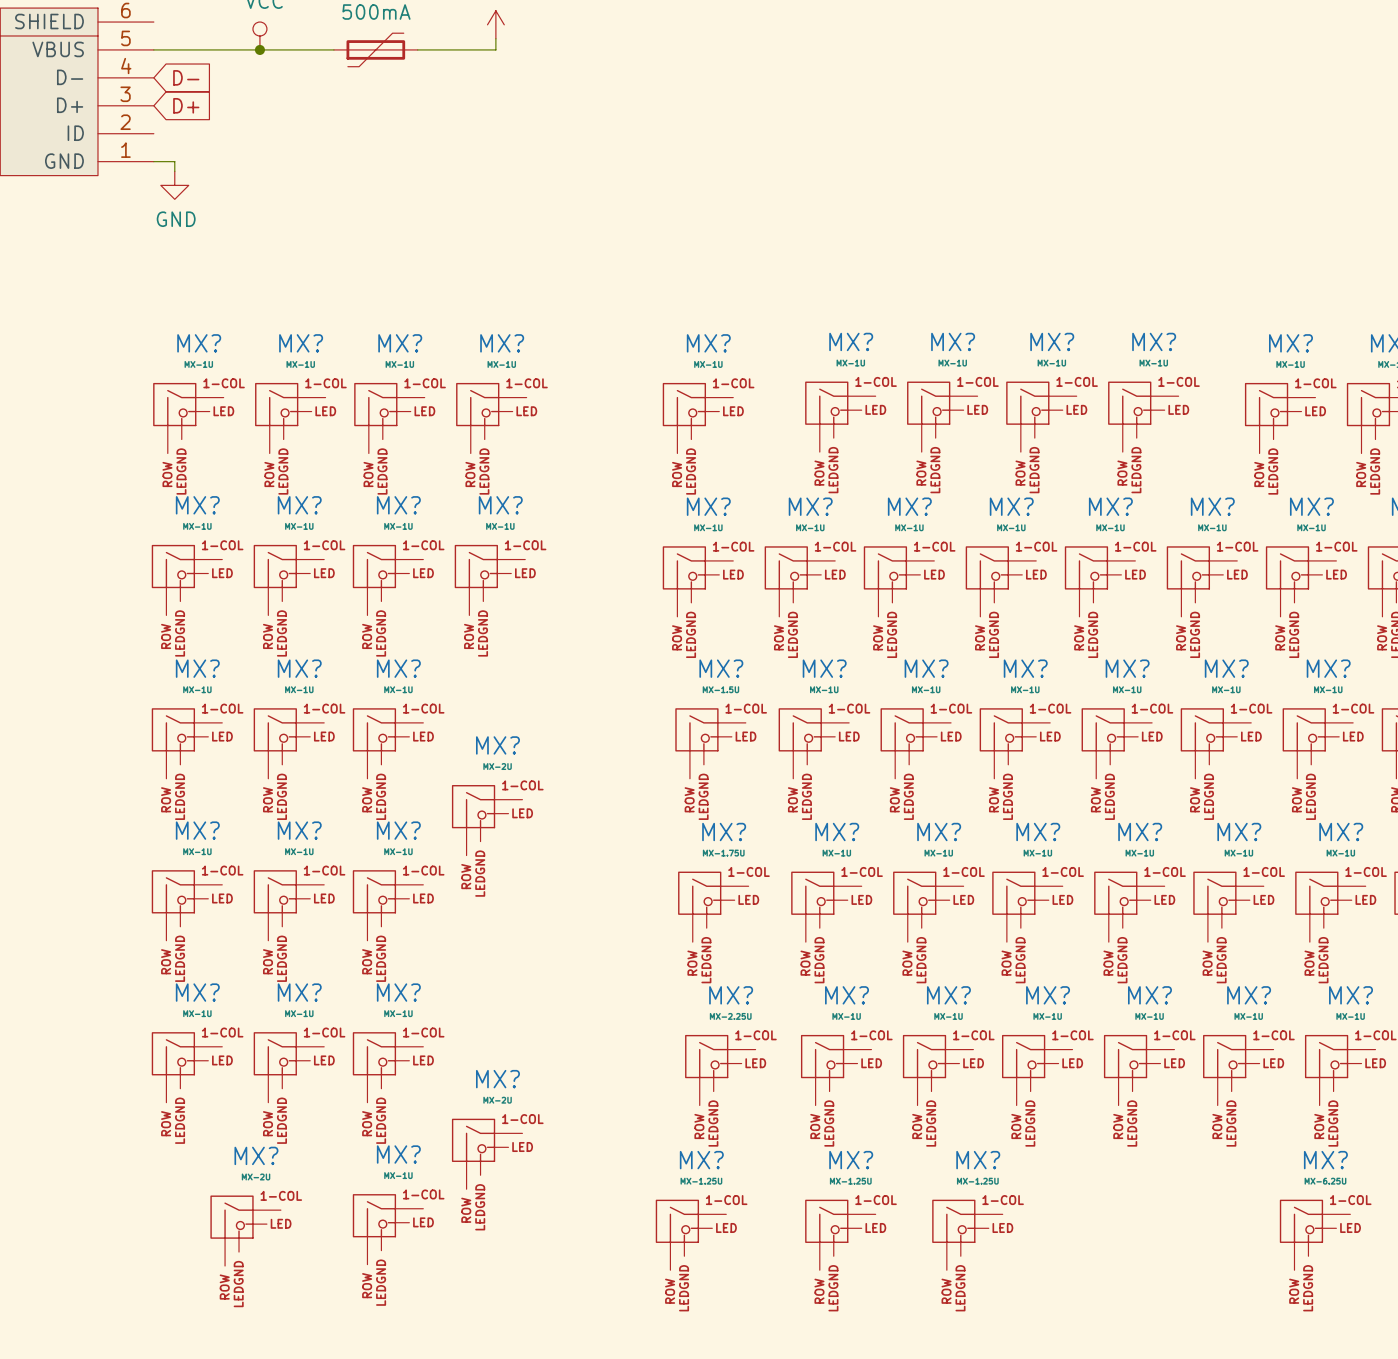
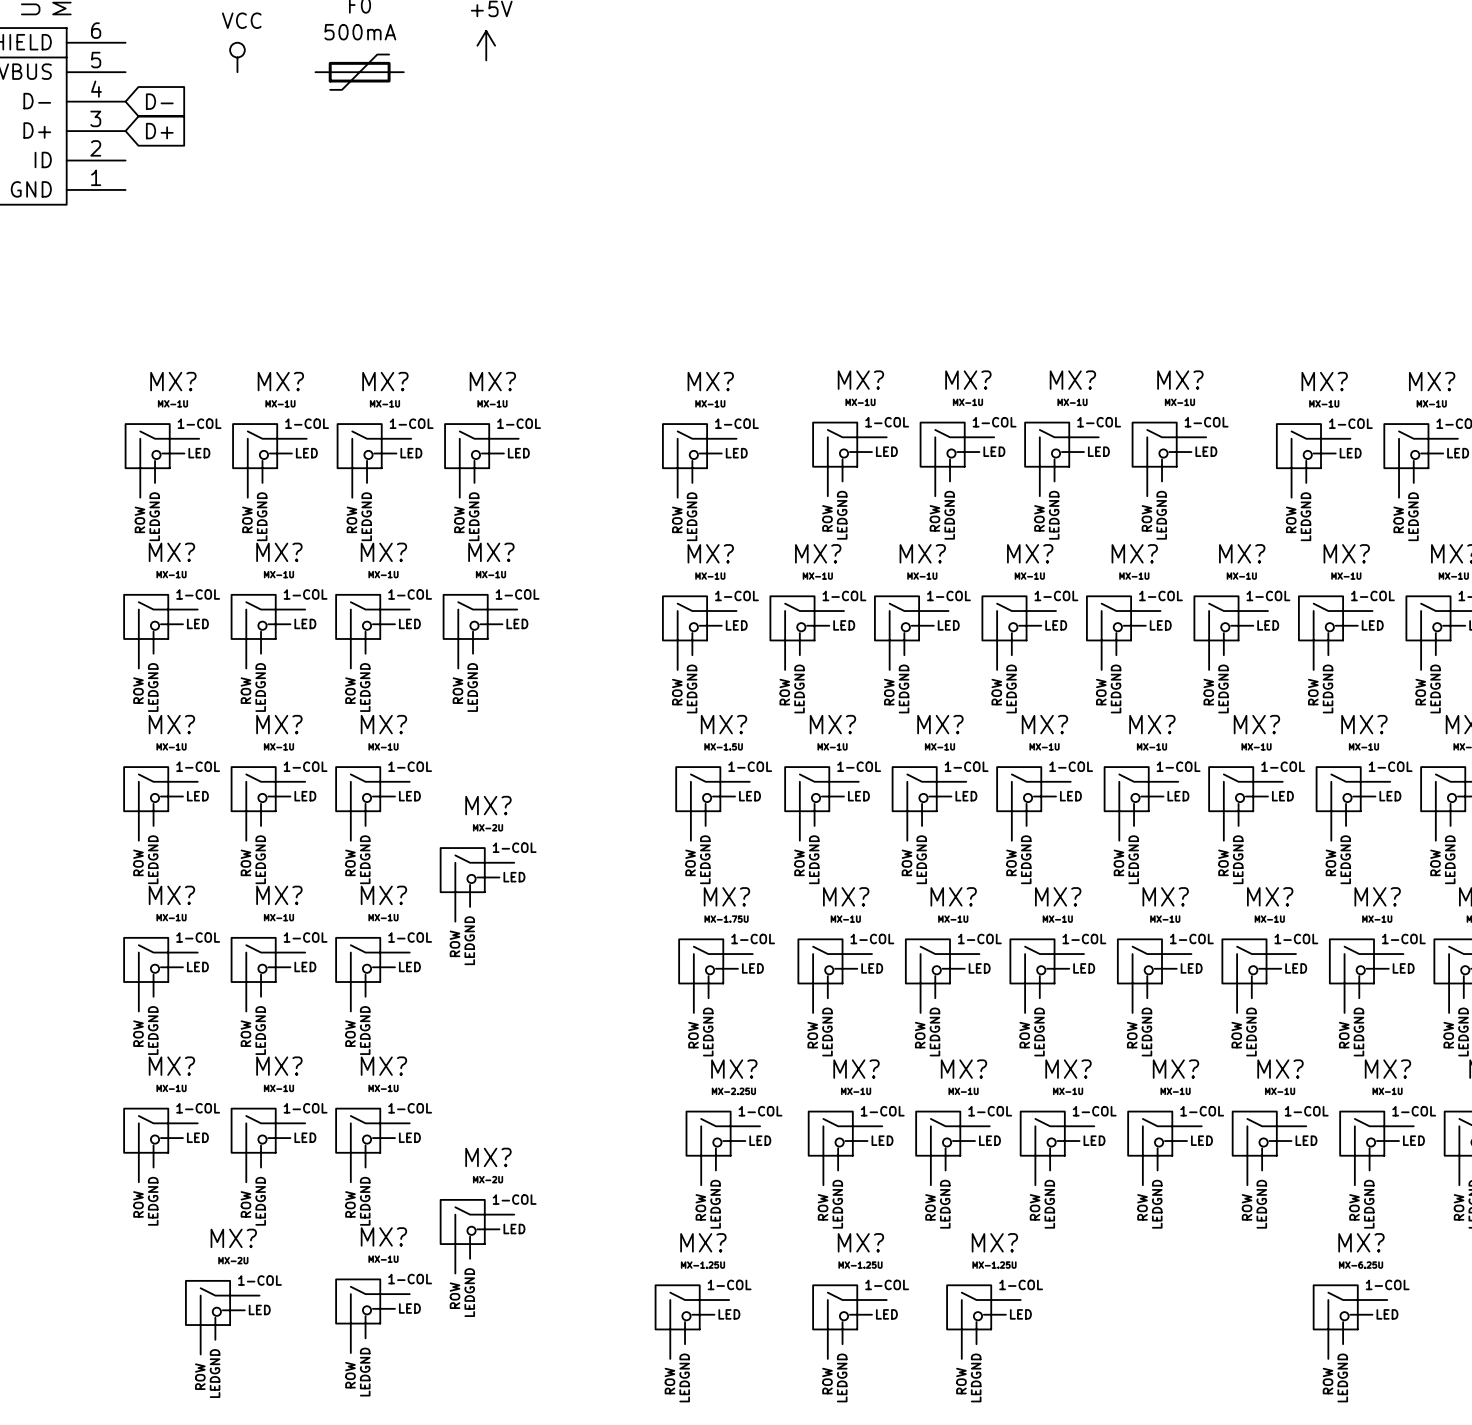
wire: (495, 38) (495, 49) (417, 49) -> none
wire: (153, 49) (333, 49) -> none
junction: (259, 49) -> none
wire: (153, 161) (174, 161) (174, 171) -> none
power symbol: GND (174, 185) -> none

